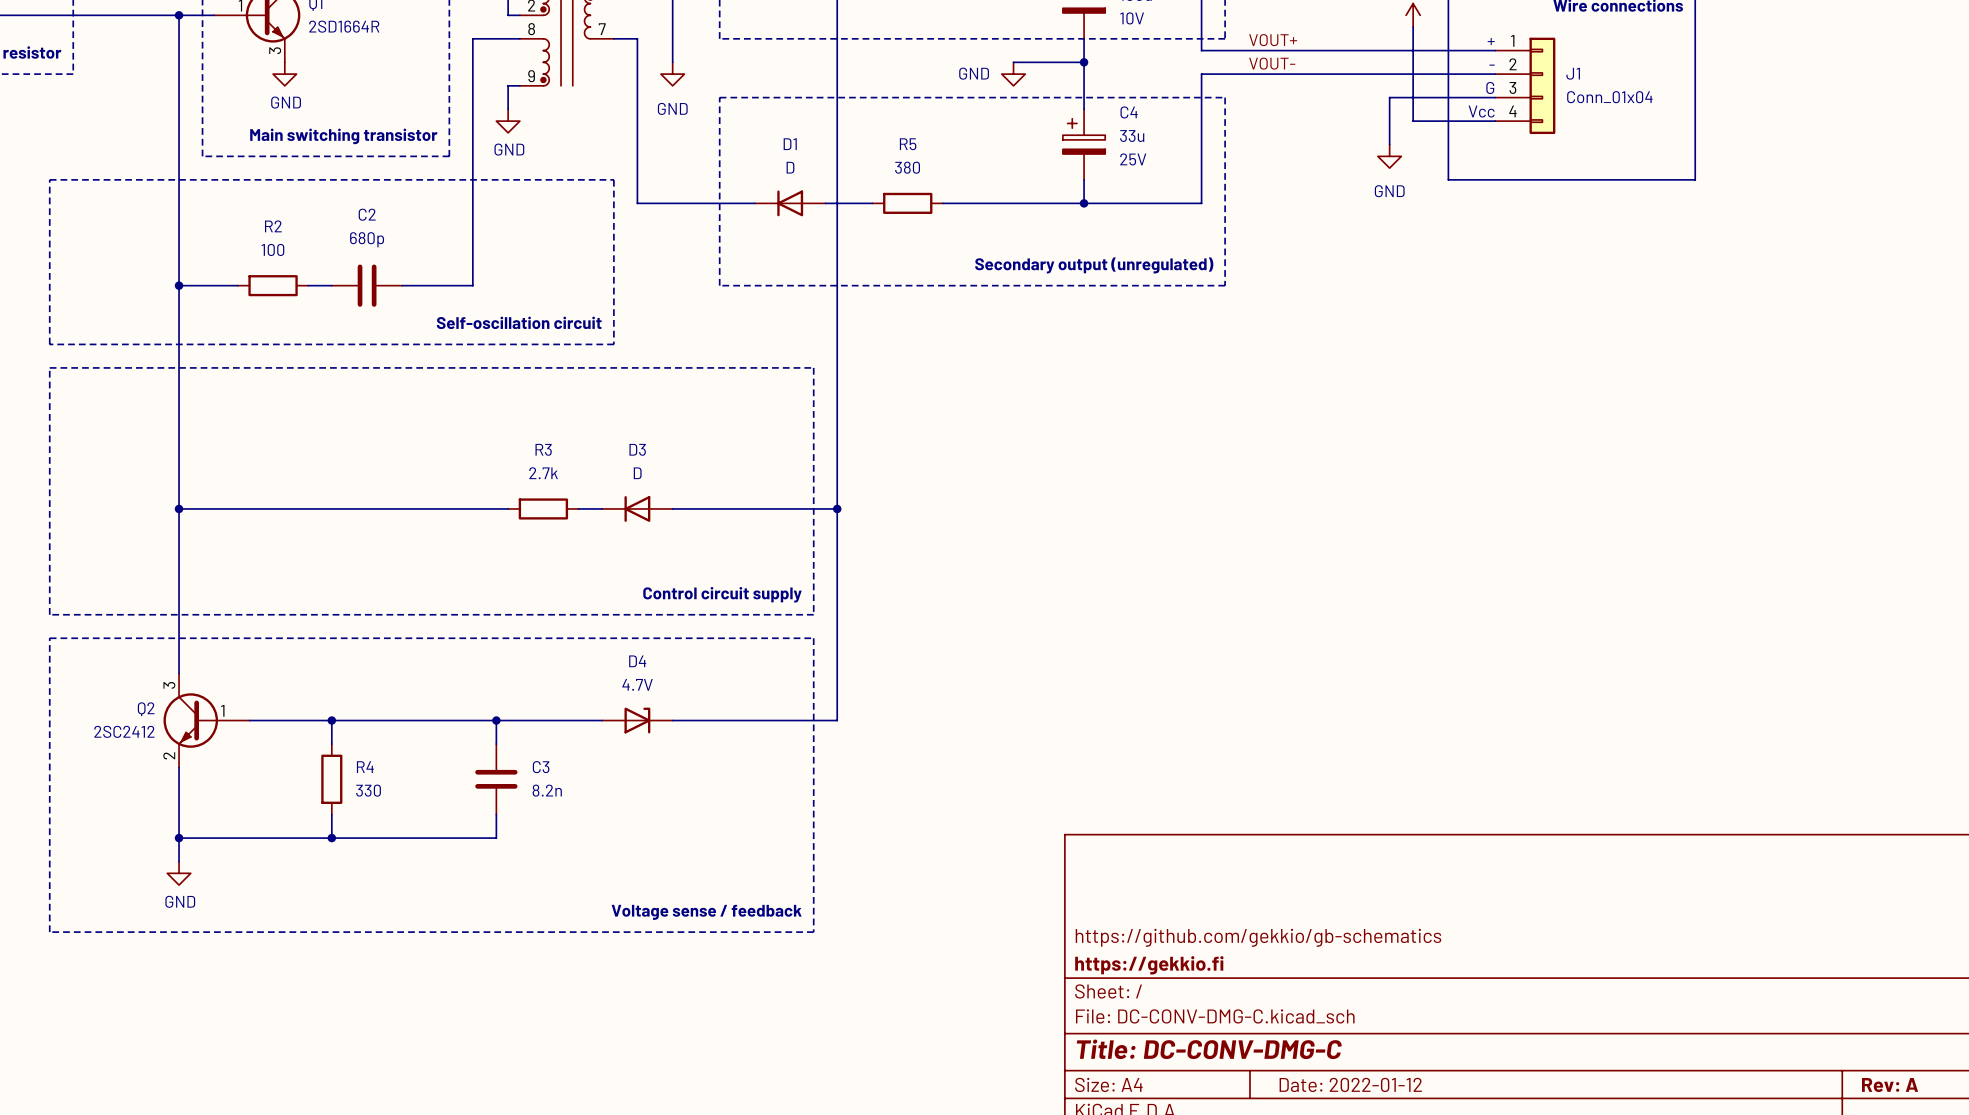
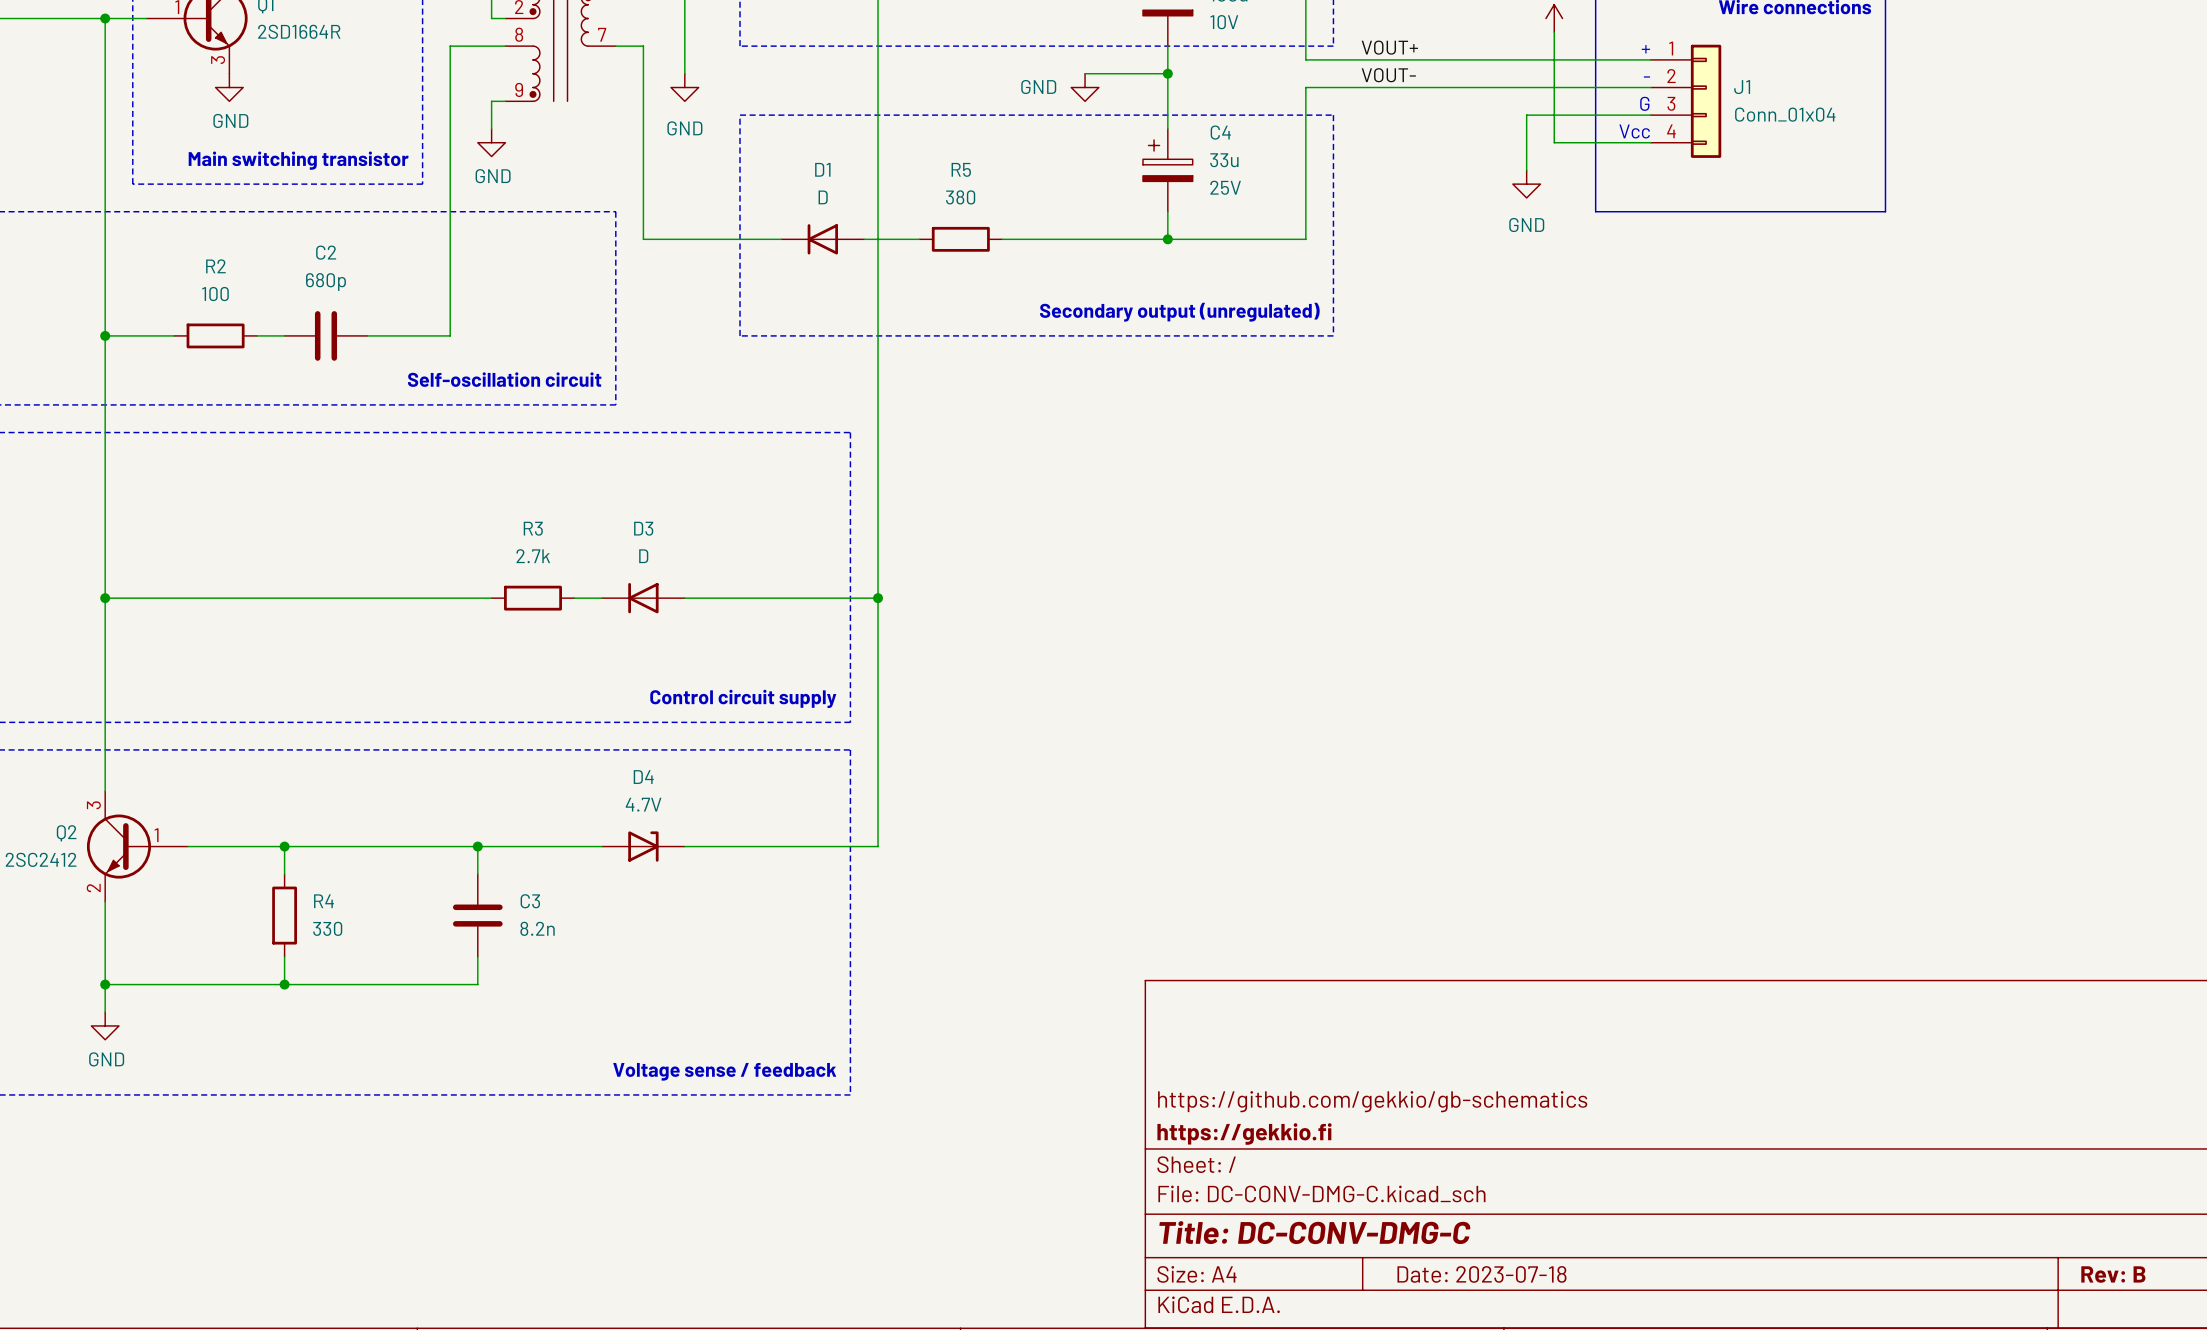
title block: Date: 2022-01-12 (1350, 1084) -> Date: 2023-07-18 (1481, 1274)
title block: Rev: A (1890, 1085) -> Rev: B (2113, 1274)

